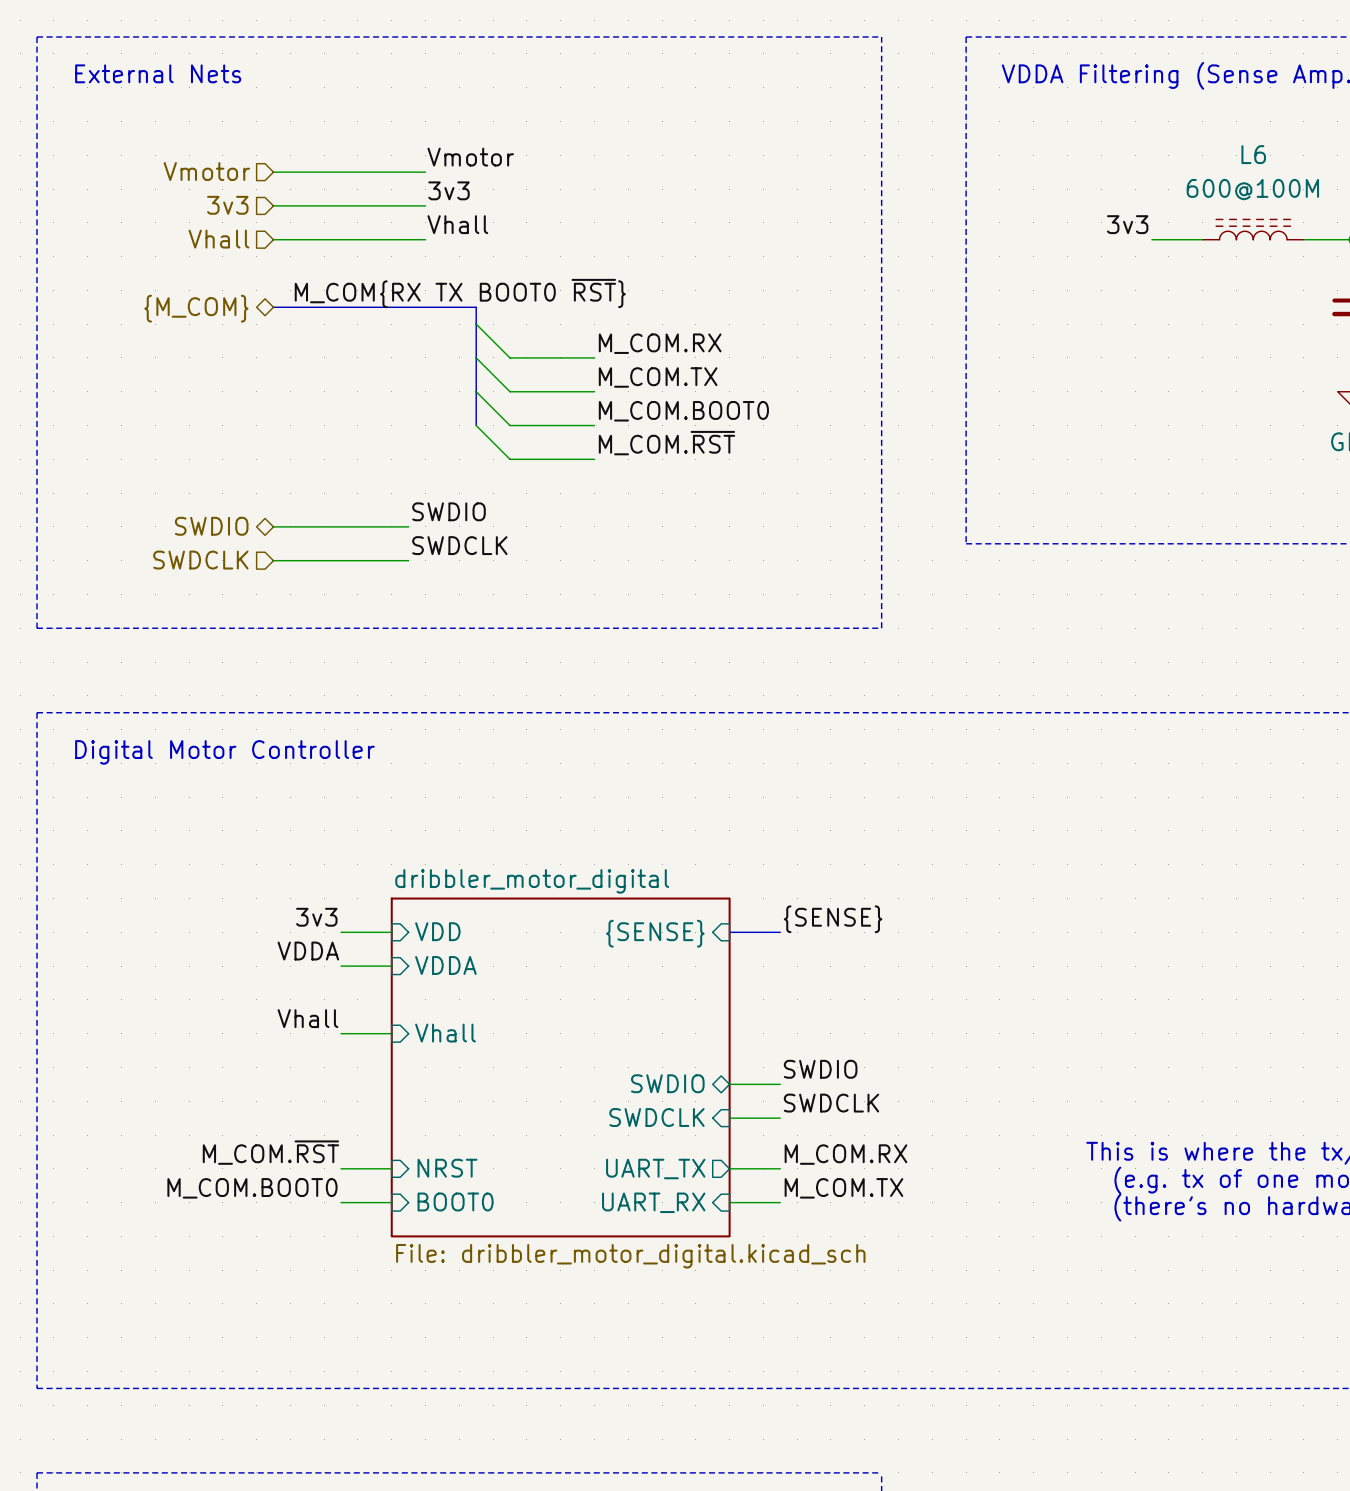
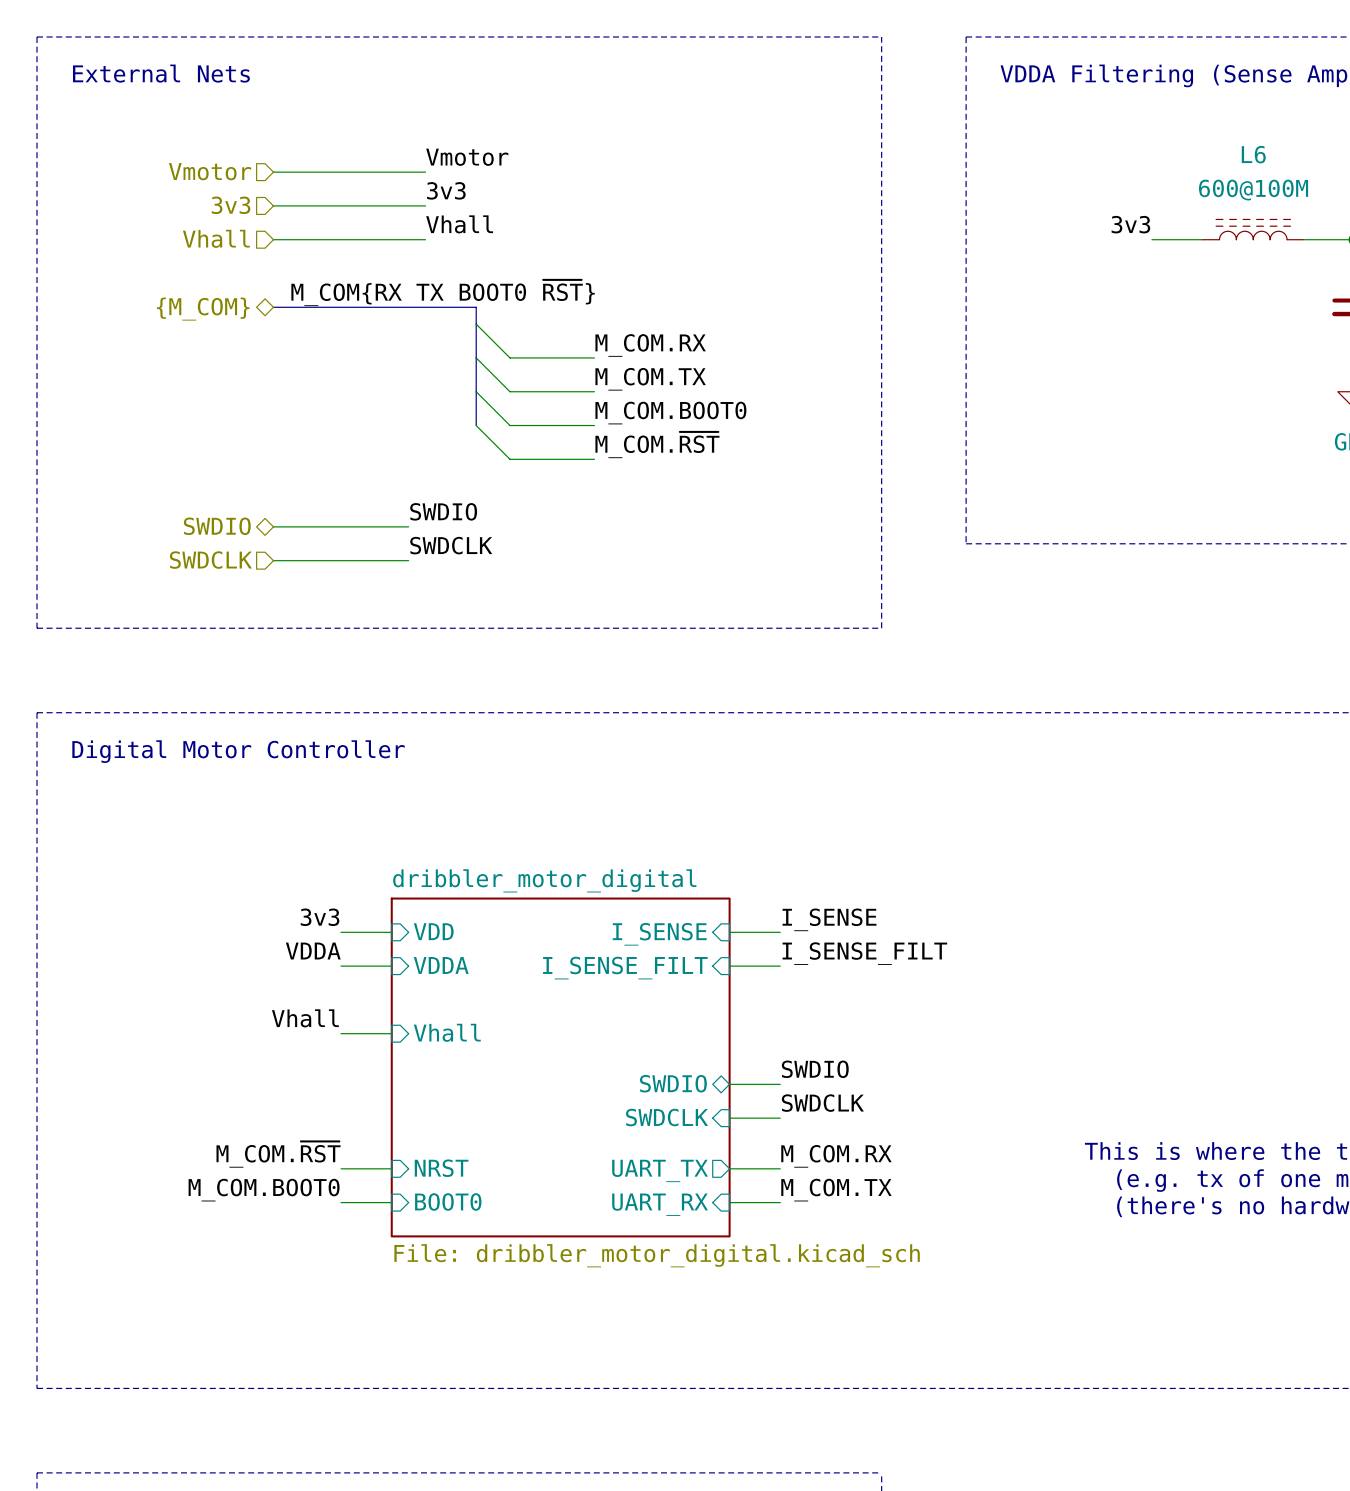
label: {SENSE} (833, 919) -> I_SENSE (829, 919)
bus: (729, 932) (780, 932) -> none
sheet pin: {SENSE} (655, 933) -> I_SENSE (659, 934)
label: none -> I_SENSE_FILT (864, 953)
sheet pin: none -> I_SENSE_FILT (625, 968)
wire: none -> (729, 966) (780, 966)

